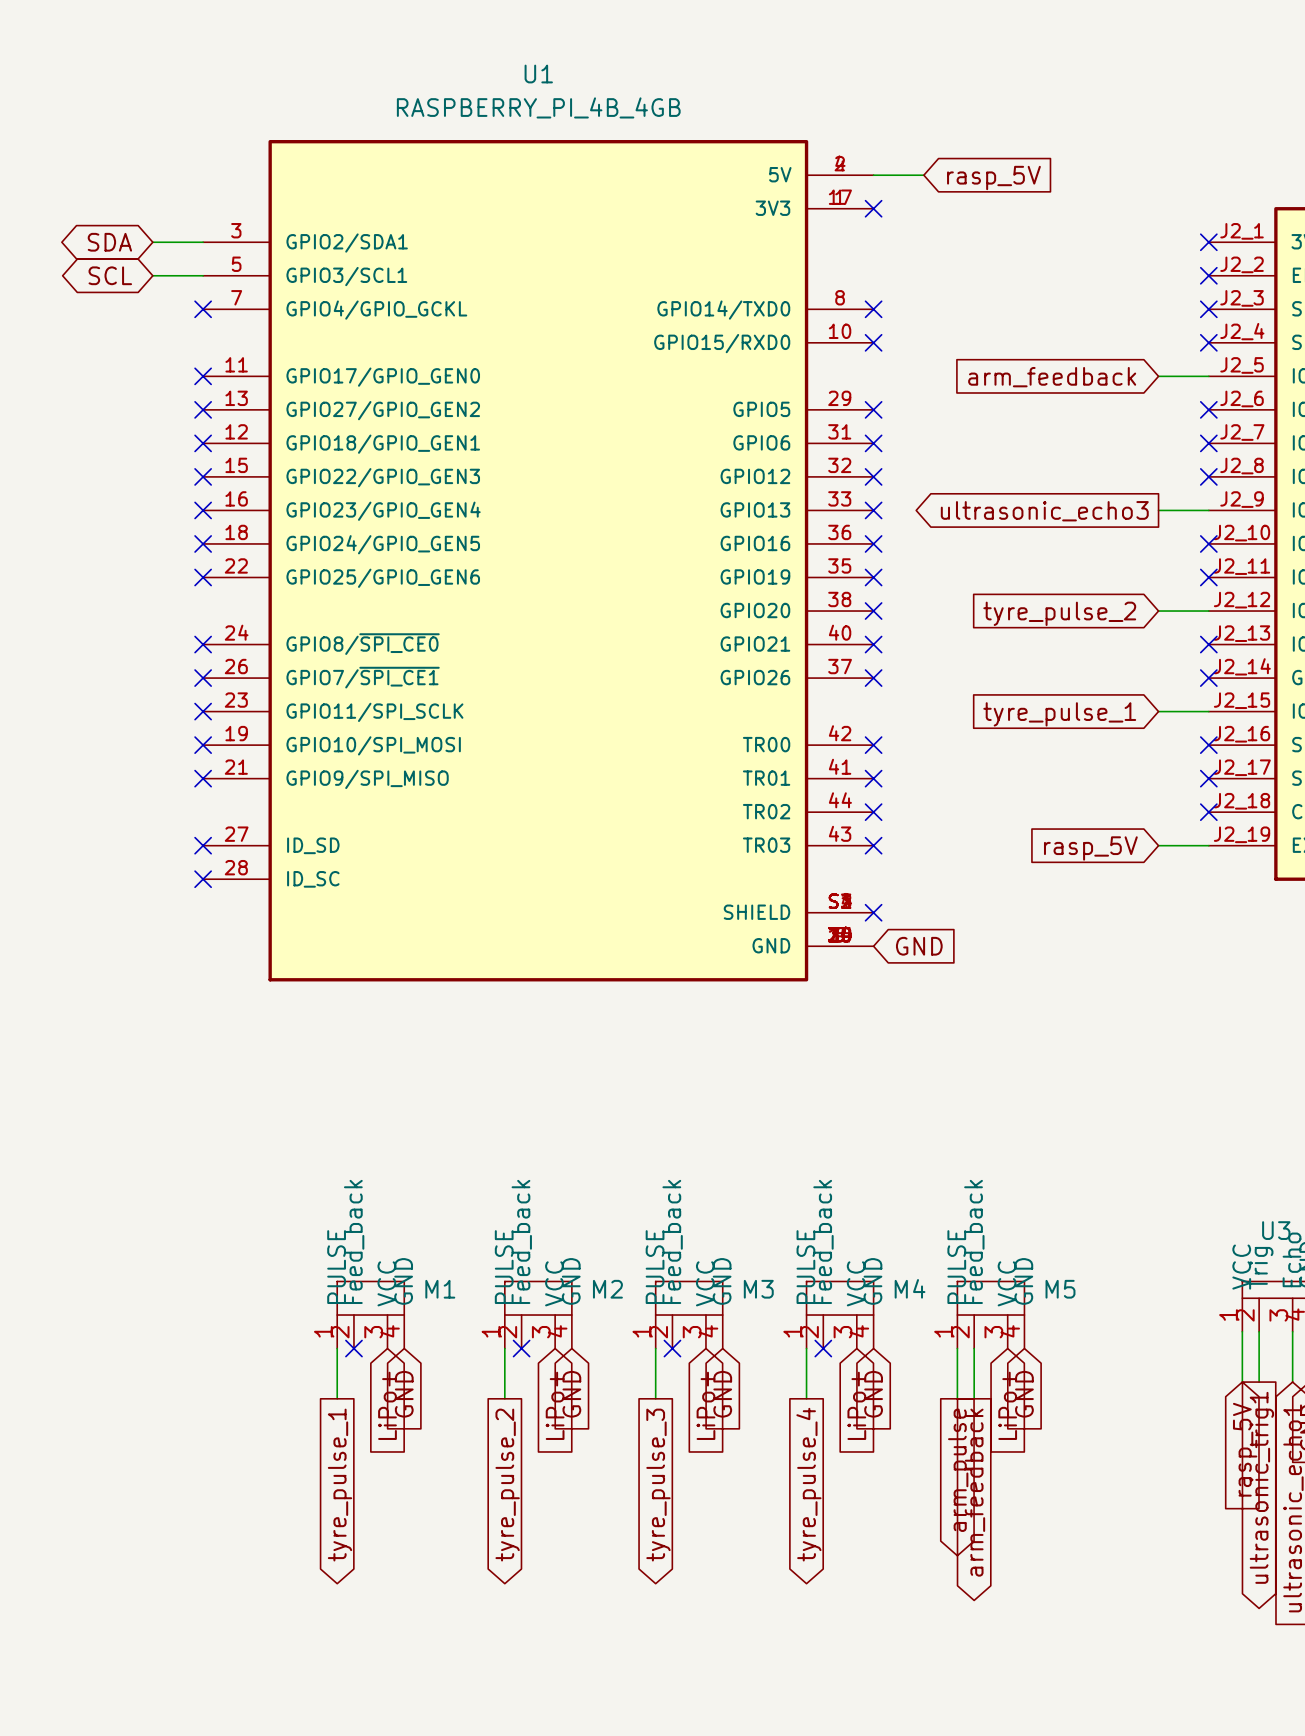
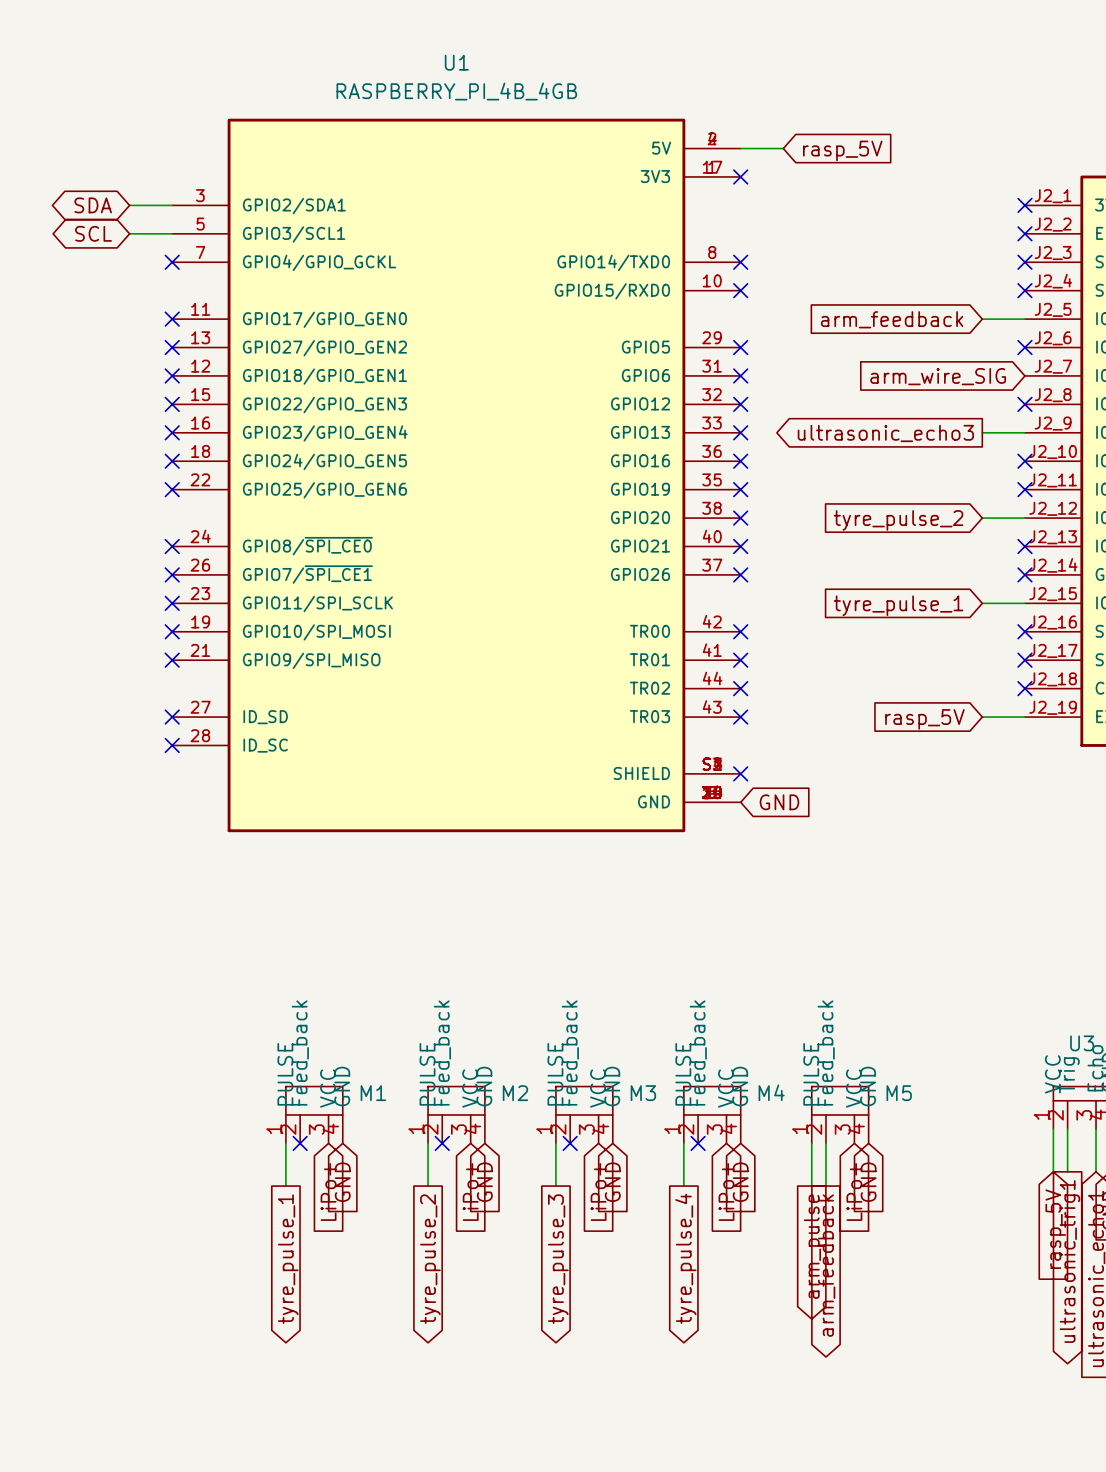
no-connect mark: (1208, 443) -> none
global label: none -> arm_wire_SIG (938, 376)

